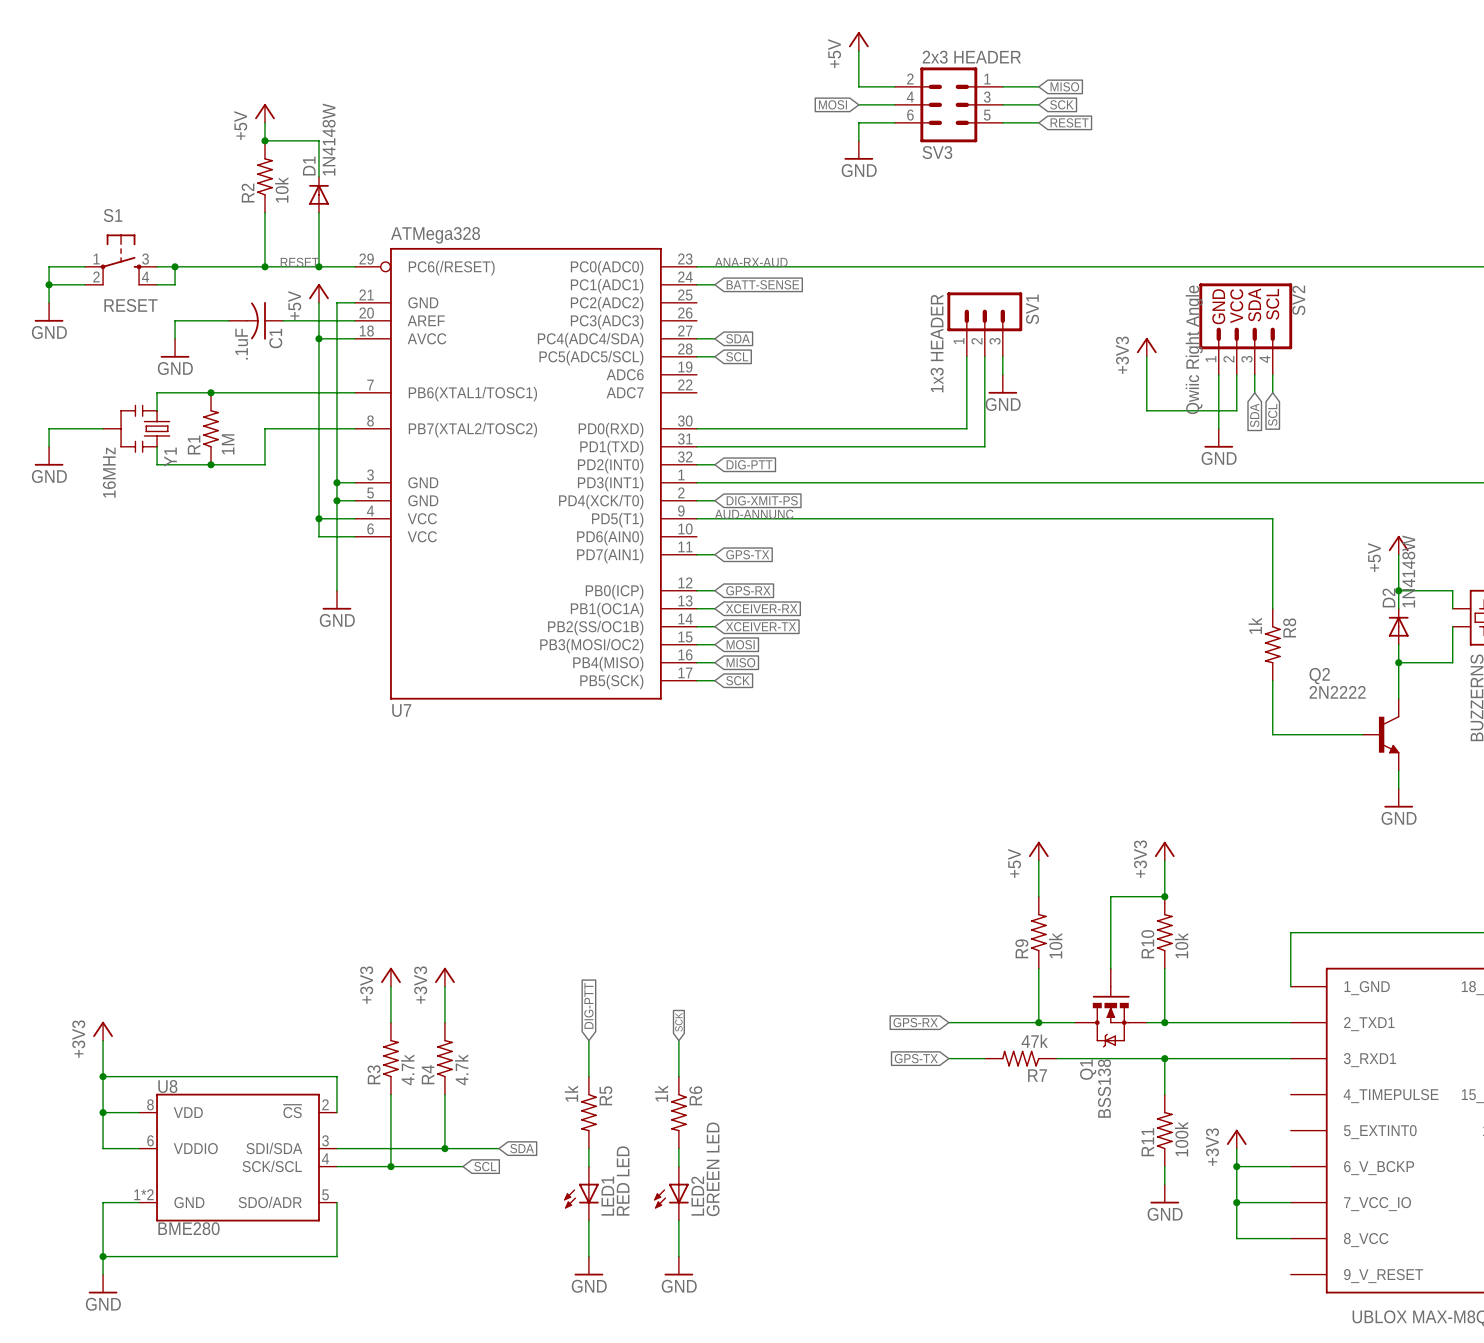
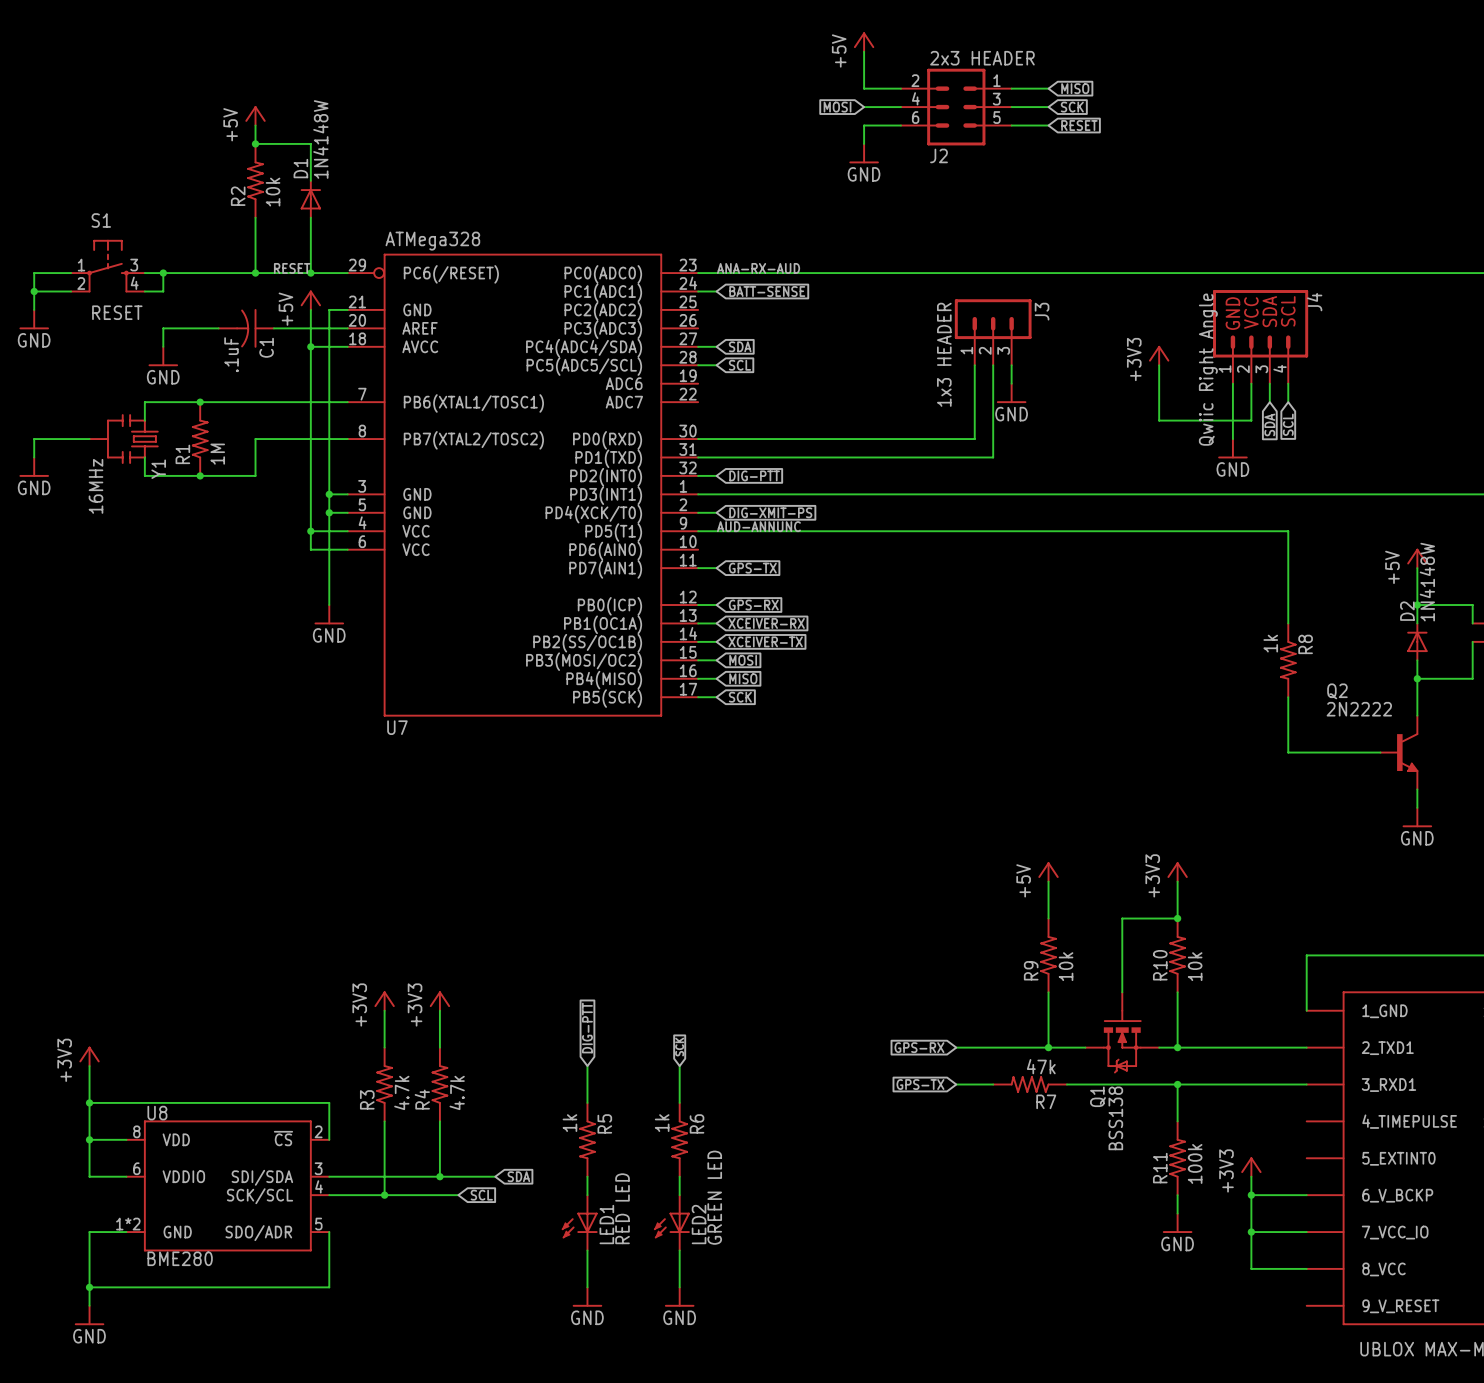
SV3 name: SV3 (937, 152) -> J2 (939, 155)
SV2 name: SV2 (1298, 300) -> J4 (1314, 302)
SV1 name: SV1 (1032, 309) -> J3 (1042, 311)

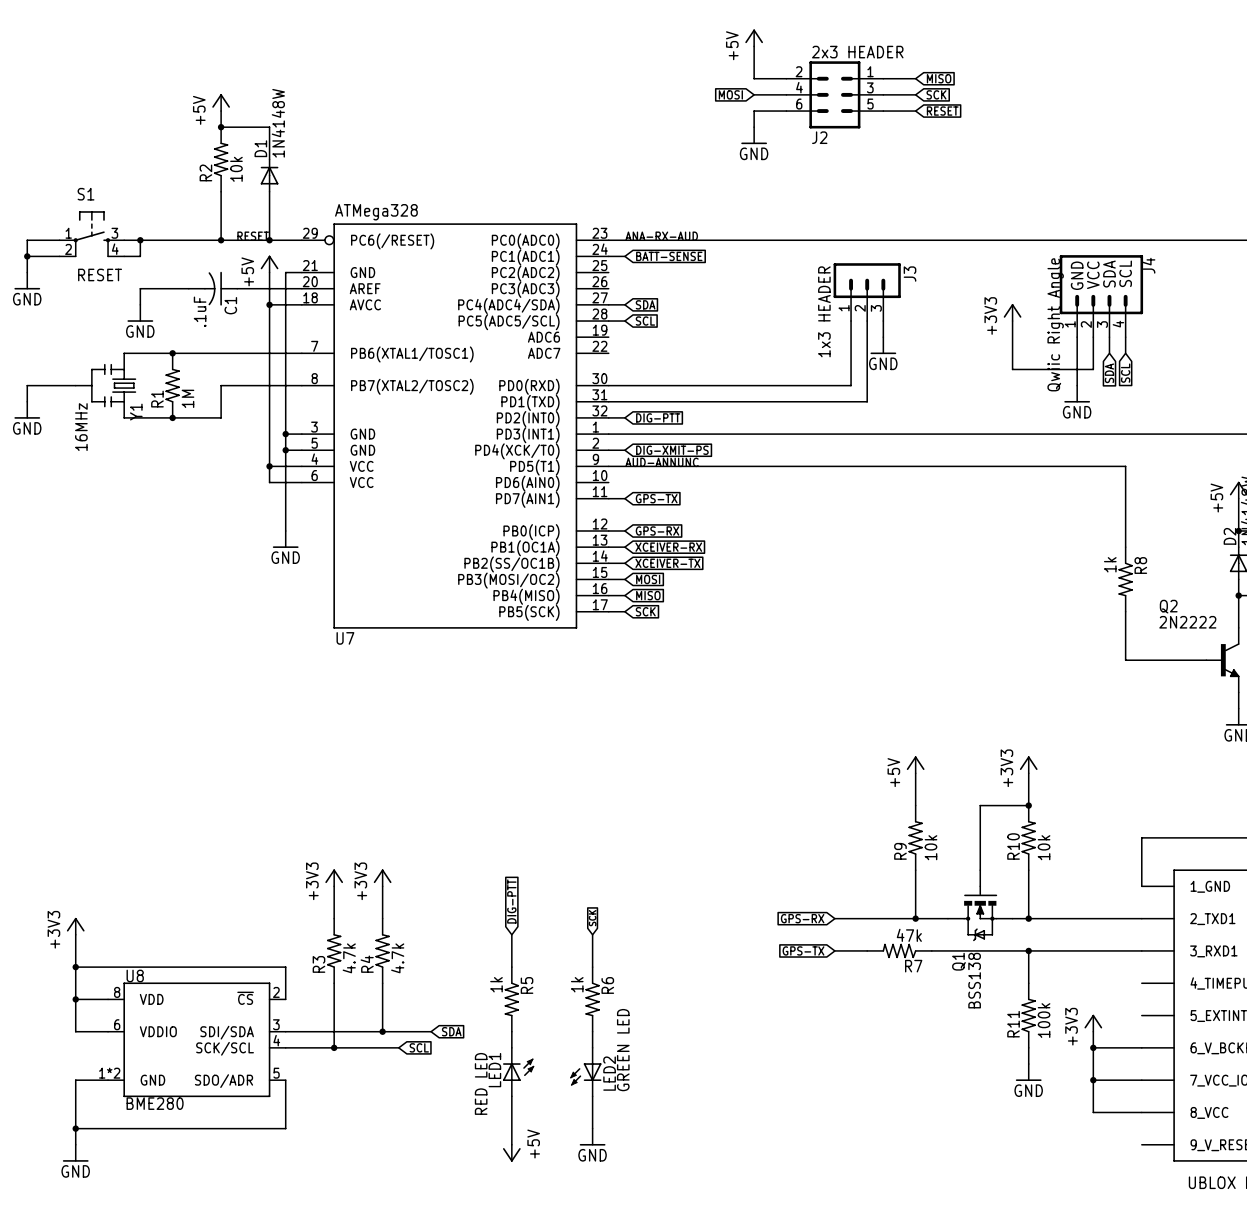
LED1 rotation: 0° (579, 1225) -> 180° (518, 1069)
power symbol: GND (587, 1297) -> none
power symbol: none -> +5V (511, 1153)

